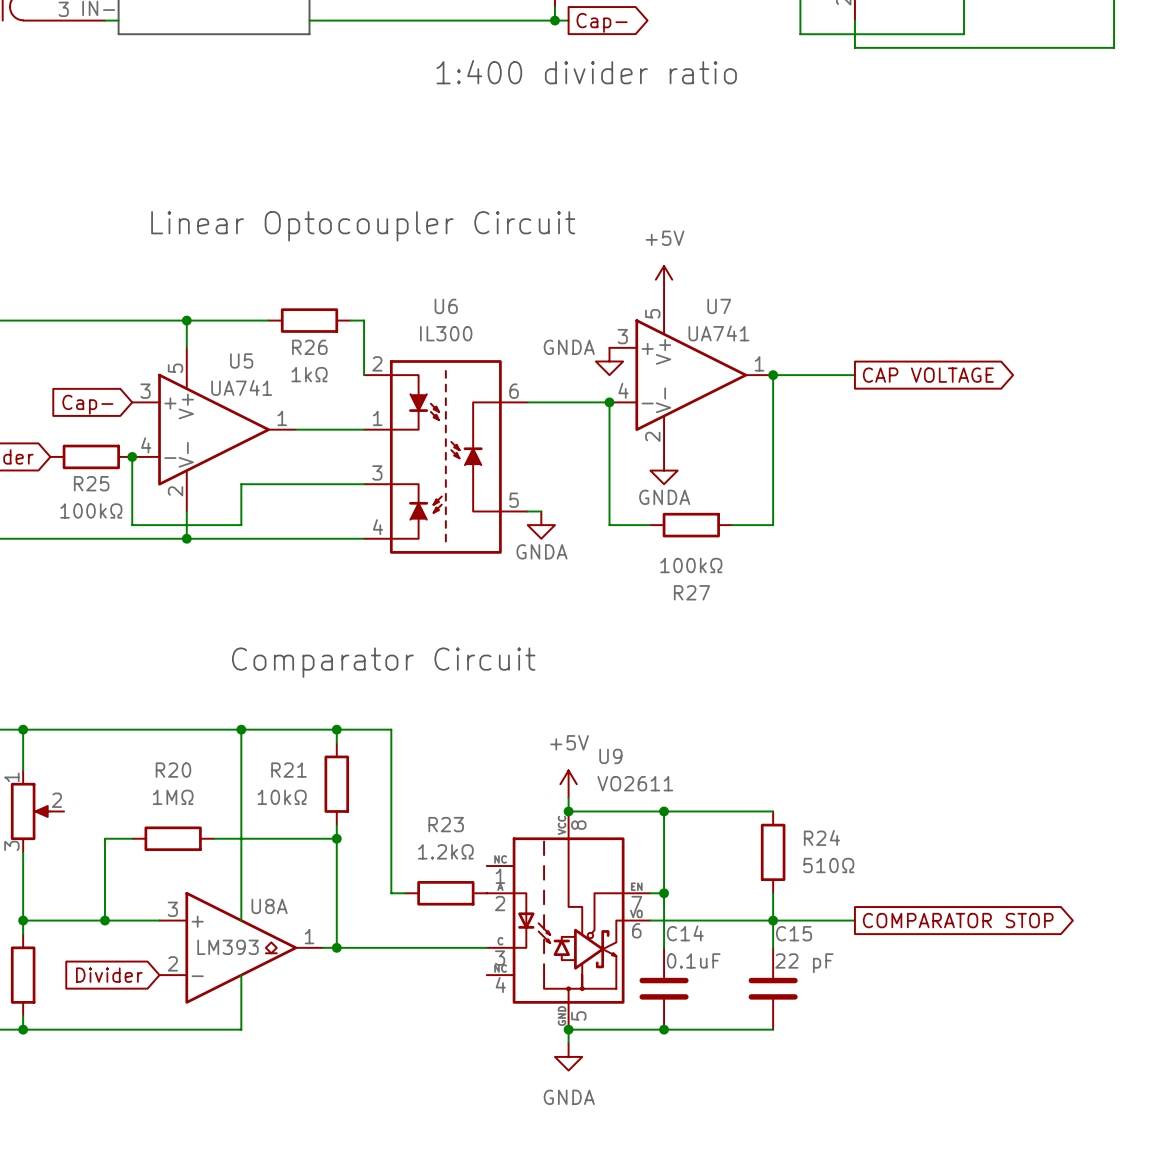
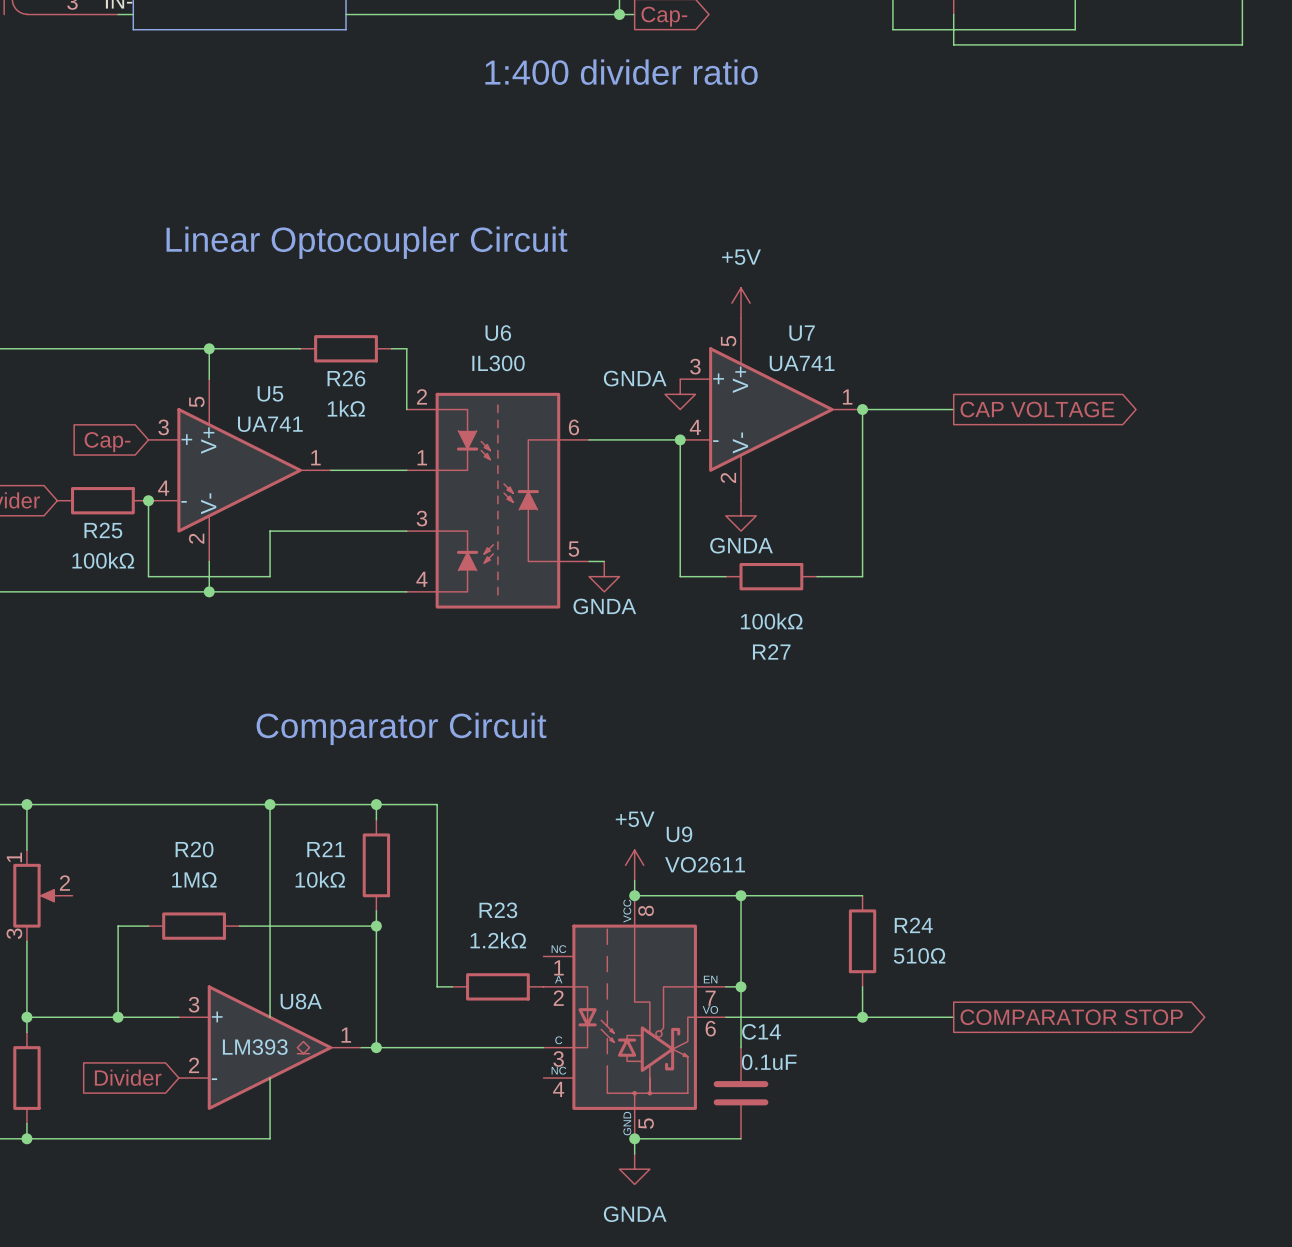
wire: (773, 920) (773, 947) -> none
C15: 22 pF (773, 988) -> none
wire: (664, 1029) (773, 1029) -> none
junction: (664, 1029) -> none

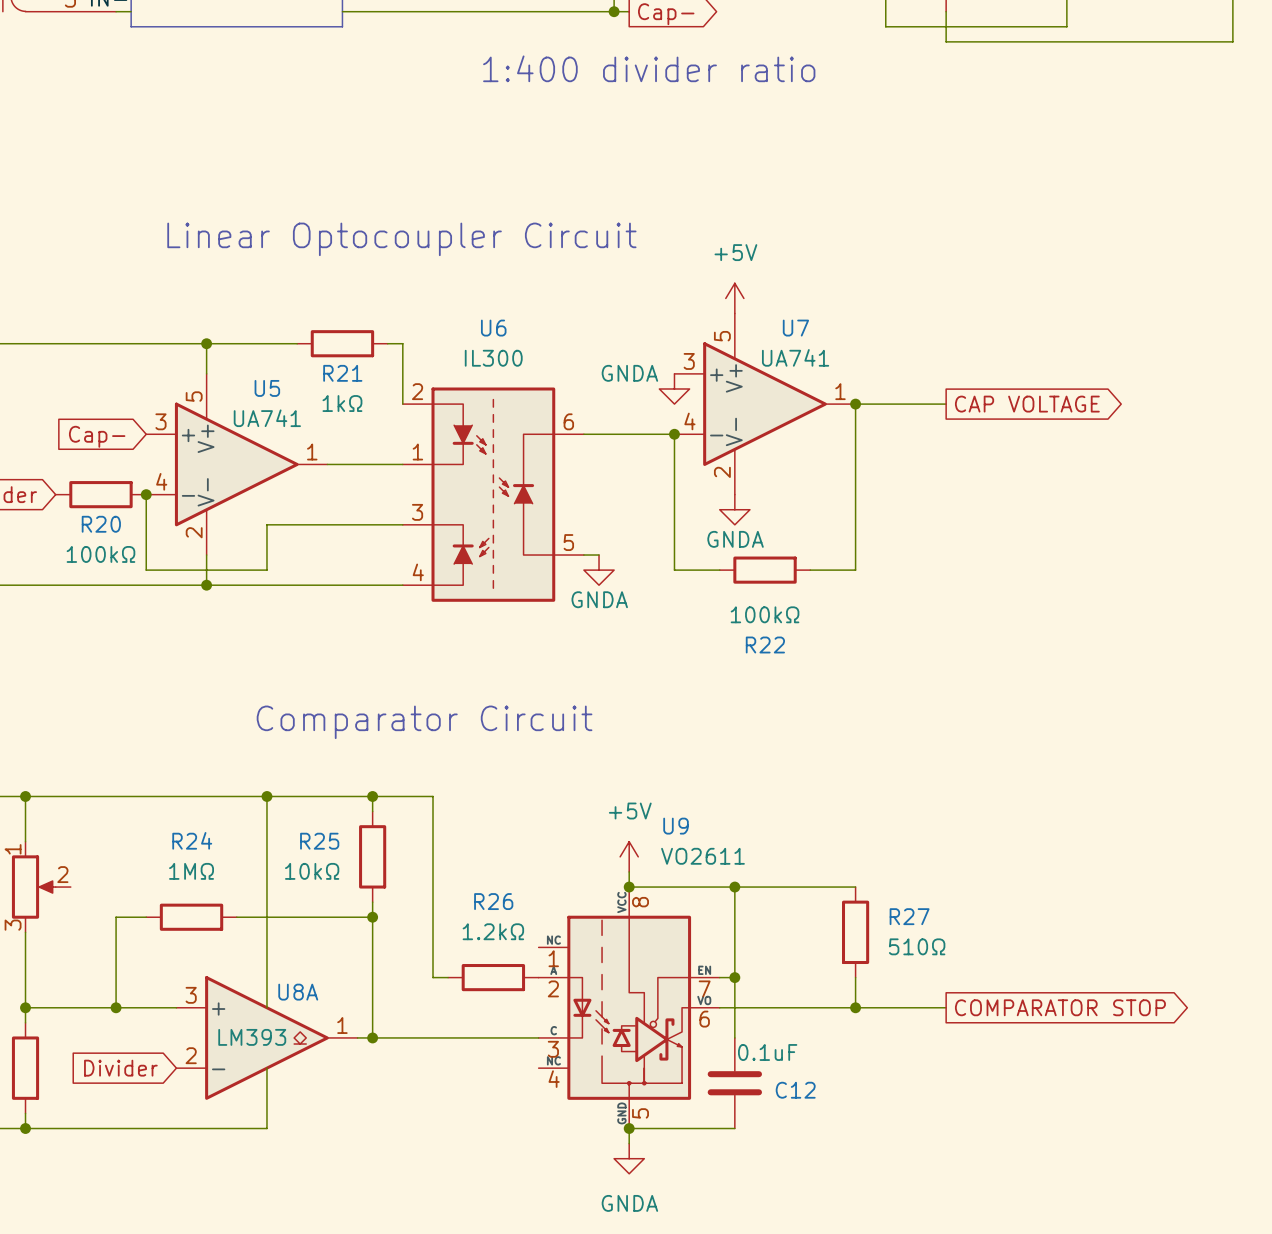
R26 name: R26 (346, 378) -> R21 (342, 373)
R25 name: R25 (103, 530) -> R20 (101, 524)
R27 name: R27 (771, 651) -> R22 (765, 645)
R20 name: R20 (194, 849) -> R24 (192, 840)
R21 name: R21 (326, 849) -> R25 (319, 841)
R23 name: R23 (498, 910) -> R26 (493, 901)
R24 name: R24 (913, 925) -> R27 (909, 916)
C14 name: C14 (761, 1031) -> C12 (795, 1090)

